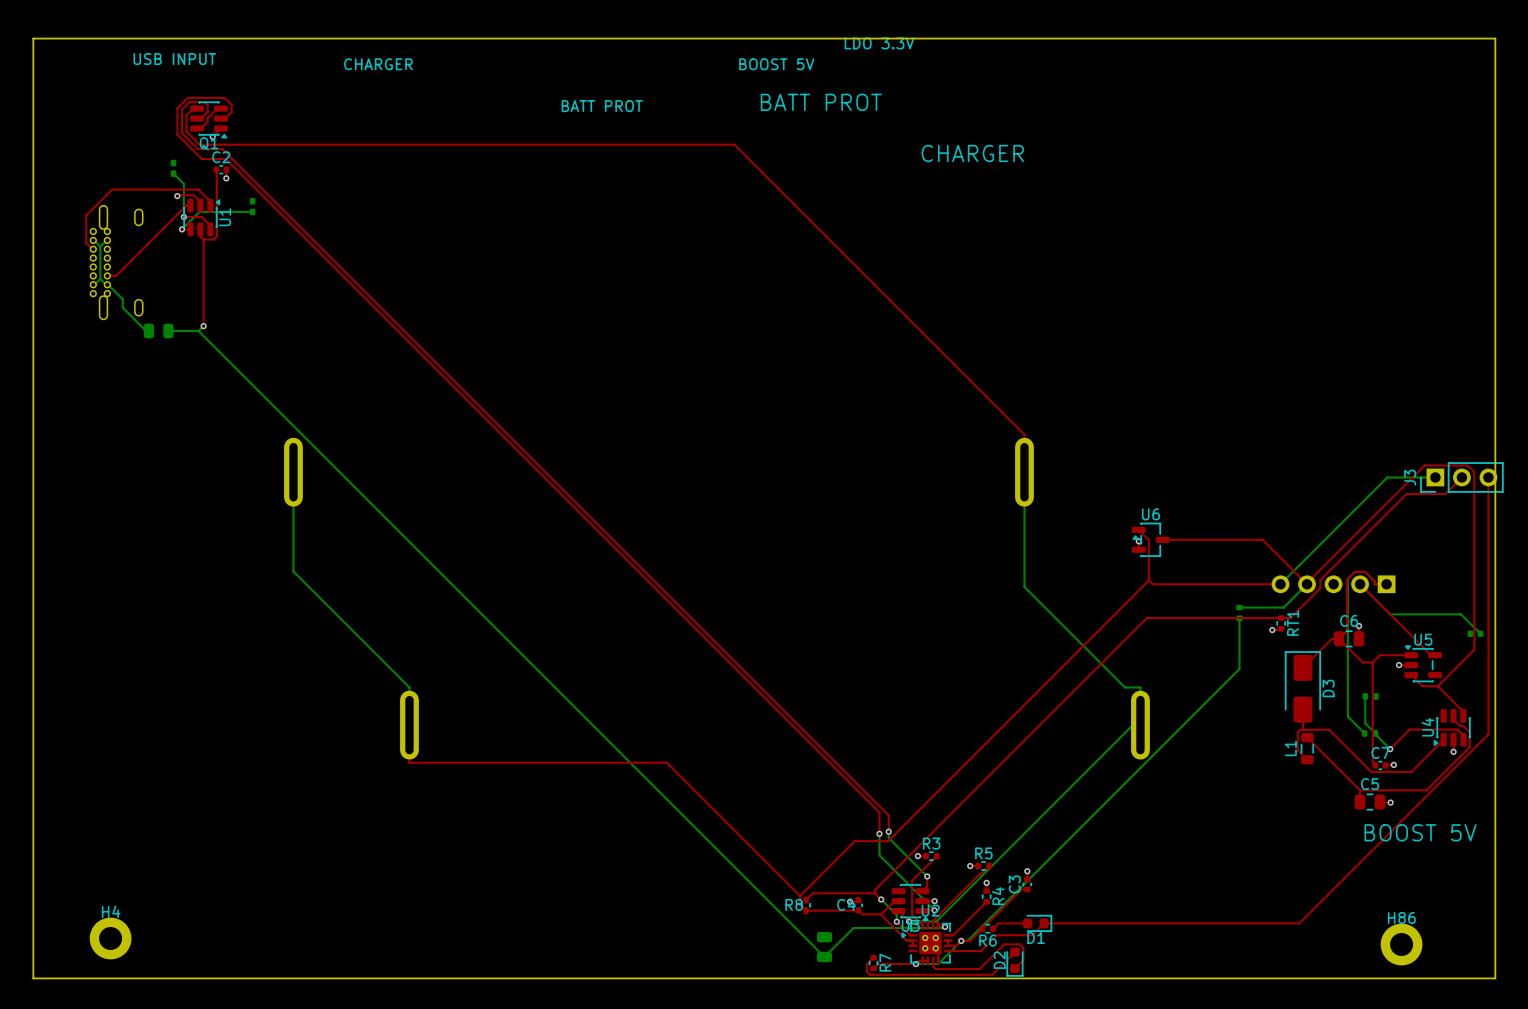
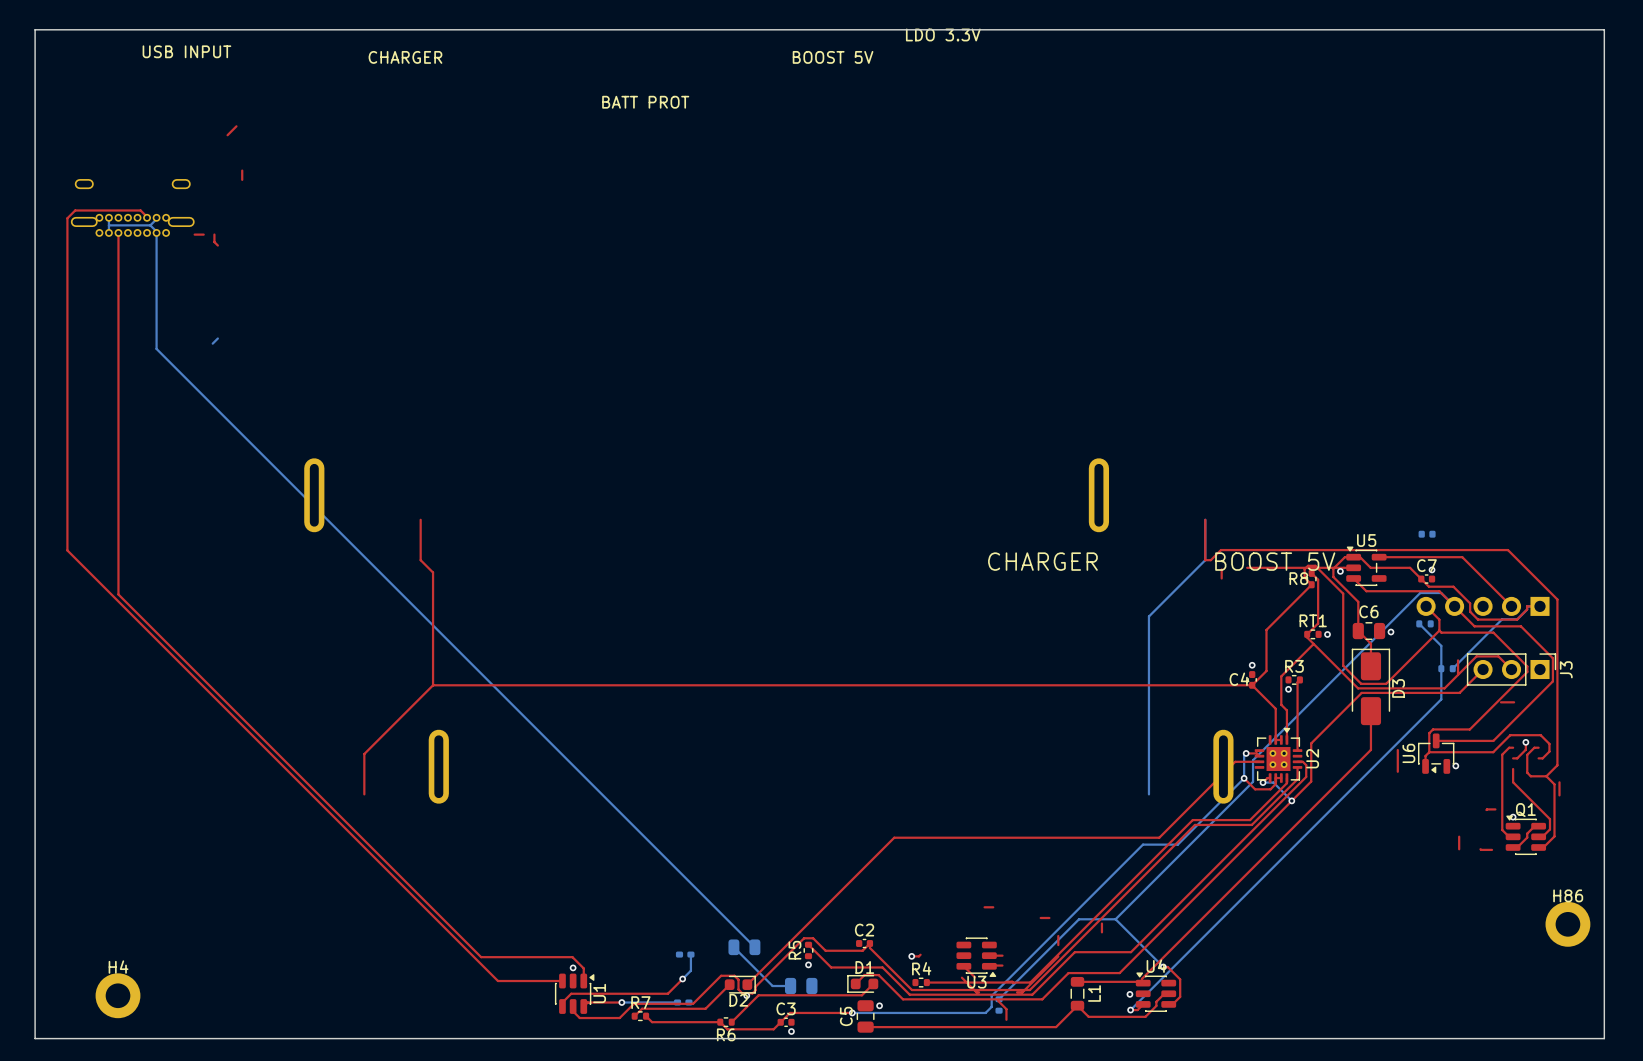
text: BATT PROT (821, 102) -> none
top track: (197, 108) (193, 108) (186, 115) (186, 131) (199, 144) (734, 144) (1024, 434) (1024, 472) -> none
top track: (220, 108) (217, 108) (200, 128) (197, 128) -> none
top track: (197, 118) (201, 118) (207, 111) (207, 105) (204, 102) (189, 102) (182, 109) (182, 133) (198, 149) (222, 149) (888, 815) (888, 831) -> none
top track: (220, 118) (225, 118) (231, 112) (231, 104) (224, 97) (187, 97) (177, 108) (177, 134) (201, 159) (225, 159) (879, 812) (879, 833) -> none
Q1 rotation: 0° (209, 120) -> 180° (1525, 835)
Q1 position: (209, 120) -> (1525, 835)
via: (212, 136) -> none
text: CHARGER (972, 153) -> none
part: (173, 168) -> none
top track: (216, 169) (216, 236) (213, 239) (203, 239) (203, 326) -> none
C2 position: (221, 169) -> (864, 943)
bottom track: (173, 173) (183, 183) (183, 216) -> none
via: (226, 178) -> none
top track: (177, 196) (193, 195) (200, 201) (200, 205) -> none
via: (177, 196) -> none
top track: (190, 205) (186, 205) (116, 275) (107, 275) -> none
top track: (210, 205) (210, 201) (198, 189) (112, 189) (86, 215) (86, 243) (93, 249) -> none
part: (252, 206) -> none
bottom track: (252, 211) (199, 211) (182, 229) -> none
bottom track: none -> (108, 217) (108, 232)
top track: none -> (147, 217) (140, 210) (75, 210) (67, 218) (67, 550) (497, 981) (562, 981)
bottom track: none -> (156, 217) (150, 225)
top track: (183, 216) (201, 216) (210, 225) (210, 229) -> none
via: (183, 216) -> none
U1 position: (201, 217) -> (574, 993)
bottom track: none -> (108, 225) (150, 225)
bottom track: none -> (150, 225) (156, 231) (156, 348) (754, 947)
top track: none -> (118, 232) (118, 594) (481, 957) (572, 957) (583, 968) (583, 981)
via: (182, 229) -> none
bottom track: (93, 240) (100, 246) -> none
bottom track: (107, 240) (100, 246) -> none
bottom track: (100, 246) (100, 278) -> none
part rotation: 0° (116, 262) -> 90° counterclockwise (132, 207)
bottom track: (100, 278) (93, 284) -> none
bottom track: (100, 278) (122, 299) (122, 307) (146, 330) (148, 330) -> none
via: (203, 326) -> none
part: (158, 330) -> none
bottom track: (168, 330) (198, 330) (824, 957) (853, 927) (945, 926) -> none
bottom track: (293, 472) (293, 571) (409, 687) (409, 725) -> none
bottom track: (1024, 472) (1024, 586) (1125, 687) (1140, 687) (1140, 725) -> none
bottom track: (1435, 477) (1387, 477) (1280, 584) -> none
top track: (1461, 477) (1445, 493) (1406, 493) (1320, 580) (1320, 588) (1290, 618) (1147, 618) (875, 890) (875, 893) -> none
J3 rotation: 0° (1461, 477) -> 180° (1511, 669)
J3 position: (1461, 477) -> (1511, 669)
top track: (1488, 477) (1488, 734) (1299, 923) (1044, 923) (1032, 935) (996, 935) (981, 951) (948, 951) -> none
top track: none -> (420, 519) (420, 560) (433, 572) (433, 685)
top track: none -> (1205, 519) (1205, 560) (1210, 560) (1220, 550) (1507, 550) (1557, 599) (1557, 765) (1546, 776)
bottom track: none -> (1205, 519) (1205, 560) (1148, 616) (1148, 794)
top track: (1138, 529) (1148, 539) (1148, 580) -> none
top track: none -> (1379, 557) (1462, 557) (1511, 606)
text: none -> CHARGER (1042, 561)
text: none -> BOOST 5V (1275, 561)
U6 rotation: 0° (1150, 539) -> 90° counterclockwise (1436, 753)
U6 position: (1150, 539) -> (1436, 753)
top track: (1261, 539) (1307, 584) (1424, 465) (1467, 465) (1474, 471) (1474, 649) (1437, 686) -> none
via: (1138, 541) -> none
via: none -> (1432, 569)
via: none -> (1340, 571)
top track: none -> (1311, 573) (1318, 579) (1318, 623) (1307, 634) (1307, 637) (1358, 688) (1444, 688) (1476, 656) (1498, 656) (1511, 669)
top track: none -> (1353, 578) (1366, 591) (1439, 591) (1474, 626) (1520, 626) (1552, 658) (1552, 681) (1493, 740) (1436, 740)
part footprint: [1271, 575, 1396, 594] -> [1416, 620, 1434, 628]
top track: none -> (1426, 606) (1439, 619) (1439, 630)
bottom track: none -> (1454, 606) (1441, 593) (1420, 593) (1253, 760) (1253, 781) (1115, 919)
part: none -> (1483, 606)
top track: none -> (1540, 606) (1527, 606) (1527, 609) (1517, 619) (1477, 619) (1470, 611) (1470, 603) (1453, 586) (1428, 586) (1410, 567) (1370, 567) (1360, 557) (1344, 557) (1333, 568) (1333, 576) (1358, 601) (1358, 631) (1370, 643) (1370, 666)
bottom track: none -> (1540, 606) (1527, 606) (1527, 609) (1517, 619) (1502, 619) (1452, 668)
top track: (1148, 580) (888, 841) (854, 841) (800, 895) -> none
top track: (1148, 580) (1152, 584) (1280, 584) -> none
bottom track: (1307, 584) (1283, 607) (1239, 607) -> none
top track: (1360, 584) (1431, 655) (1435, 655) -> none
bottom track: (1360, 584) (1390, 614) (1460, 614) (1480, 633) -> none
top track: (1386, 584) (1374, 584) (1374, 581) (1365, 571) (1355, 571) (1346, 580) (1346, 631) (1339, 638) -> none
bottom track: (1386, 584) (1374, 584) (1374, 581) (1365, 571) (1354, 571) (1347, 578) (1347, 716) (1364, 733) -> none
bottom track: none -> (1419, 623) (1441, 645) (1441, 699) (1130, 1010)
top track: none -> (1439, 630) (1441, 632) (1493, 632) (1527, 666) (1527, 671) (1469, 729) (1433, 729) (1429, 733) (1429, 752)
top track: none -> (1439, 630) (1386, 683) (1361, 683) (1343, 665) (1343, 593) (1315, 565) (1308, 565) (1304, 569) (1304, 577) (1311, 584) (1266, 629) (1266, 671) (1252, 685)
via: none -> (1390, 632)
via: none -> (1327, 634)
top track: none -> (1313, 643) (1281, 676) (1281, 704) (1286, 710) (1286, 739)
part: (1239, 612) -> none
bottom track: (1239, 618) (1239, 668) (967, 940) (961, 940) (938, 964) (915, 964) -> none
RT1 rotation: 0° (1281, 623) -> 90° clockwise (1312, 634)
RT1 position: (1281, 623) -> (1312, 634)
via: (1359, 626) -> none
via: none -> (1252, 665)
via: (1272, 630) -> none
part: none -> (1447, 668)
part position: (1475, 633) -> (1427, 534)
top track: none -> (1483, 669) (1459, 692) (1361, 692) (1311, 743) (1311, 781) (1119, 973) (1068, 973) (1042, 999) (903, 999) (878, 975) (864, 975) (855, 983)
top track: (1339, 638) (1362, 662) (1372, 662) -> none
top track: (1339, 638) (1331, 638) (1302, 667) -> none
C6 position: (1349, 638) -> (1368, 631)
top track: none -> (1299, 679) (1297, 682) (1297, 750)
top track: none -> (433, 685) (1252, 685)
top track: none -> (433, 685) (364, 754) (364, 794)
top track: none -> (1252, 685) (1275, 708) (1275, 739) (1281, 739)
via: none -> (1288, 689)
top track: (1411, 655) (1380, 655) (1372, 662) -> none
top track: (1372, 662) (1372, 762) (1375, 765) -> none
U5 position: (1423, 663) -> (1366, 566)
via: (1399, 665) -> none
top track: none -> (1370, 711) (1370, 749) (1141, 978) (1141, 981) (1077, 981)
top track: (1411, 675) (1422, 686) (1437, 686) -> none
top track: (1437, 686) (1463, 711) (1463, 715) -> none
D3 position: (1302, 687) -> (1370, 686)
bottom track: (1365, 696) (1365, 723) (1390, 749) -> none
part: (1370, 696) -> none
top track: none -> (1525, 742) (1525, 749) (1517, 758) (1513, 758)
via: none -> (1525, 742)
top track: none -> (1513, 747) (1509, 747) (1502, 754) (1502, 830) (1509, 836) (1513, 836)
top track: none -> (1538, 747) (1534, 747) (1527, 754) (1527, 772) (1530, 776) (1546, 776)
top track: none -> (1429, 752) (1493, 752) (1510, 735) (1540, 735) (1549, 743) (1549, 751) (1542, 758) (1538, 758)
top track: none -> (1429, 752) (1425, 755) (1425, 766)
top track: none -> (1246, 753) (1256, 753) (1259, 756)
bottom track: none -> (1246, 753) (1244, 755) (1244, 778) (1177, 844) (1142, 844) (991, 995) (991, 1006) (985, 1012) (852, 1012)
via: none -> (1246, 753)
top track: (1453, 715) (1453, 719) (1469, 732) (1469, 746) (1426, 790) (1360, 790) (1307, 737) -> none
bottom track: (1140, 717) (936, 921) (909, 921) -> none
top track: none -> (1259, 761) (1235, 761) (1159, 837) (894, 837) (747, 984)
top track: none -> (1297, 761) (1302, 761) (1306, 765) (1306, 776) (1130, 952) (1074, 952) (1032, 994) (909, 994) (882, 967) (831, 967) (808, 944)
via: none -> (1455, 765)
top track: (409, 725) (409, 762) (666, 762) (800, 895) -> none
top track: none -> (1297, 767) (1297, 779) (1251, 824) (1194, 824) (1029, 990) (911, 990) (869, 947) (869, 943) (862, 950) (825, 950) (813, 938) (804, 938) (755, 986) (752, 993) (742, 993) (738, 989) (738, 979) (734, 975) (721, 975) (693, 1003) (633, 1003) (619, 1018) (579, 1018) (573, 1011) (573, 1006)
top track: none -> (1513, 769) (1513, 782) (1549, 819) (1549, 829) (1542, 836) (1538, 836)
U4 rotation: 0° (1452, 727) -> 90° clockwise (1155, 992)
U4 position: (1452, 727) -> (1155, 992)
part: (1370, 733) -> none
top track: none -> (1546, 776) (1554, 784) (1554, 836) (1543, 847) (1538, 847)
via: none -> (1244, 778)
top track: none -> (1270, 778) (1263, 782)
top track: none -> (1281, 778) (1275, 778) (1275, 784) (1270, 789) (1255, 789) (1244, 778)
top track: none -> (1286, 778) (1286, 783) (1250, 820) (1192, 820) (1030, 982) (926, 982)
bottom track: none -> (1263, 782) (1273, 782) (1291, 800)
via: none -> (1263, 782)
top track: (1443, 739) (1411, 771) (1371, 771) (1329, 729) (1300, 729) (1297, 732) (1297, 750) (1307, 759) -> none
top track: (1463, 739) (1463, 735) (1457, 729) (1409, 729) (1390, 749) -> none
L1 name position: L1 (1290, 748) -> L1 (1094, 993)
L1 position: (1307, 748) -> (1077, 993)
via: (1390, 749) -> none
via: (1453, 751) -> none
via: none -> (1291, 800)
via: (1393, 764) -> none
C7 position: (1380, 765) -> (1426, 579)
via: none -> (1513, 817)
top track: none -> (1538, 826) (1534, 826) (1517, 847) (1513, 847)
C5 name position: C5 (1370, 784) -> C5 (846, 1016)
C5 rotation: 0° (1370, 802) -> 90° clockwise (865, 1016)
C5 position: (1370, 802) -> (865, 1016)
via: (1390, 802) -> none
bottom track: (888, 831) (888, 837) (927, 876) -> none
via: (888, 831) -> none
text: BOOST 5V (1420, 832) -> none
bottom track: (879, 833) (879, 855) (934, 910) -> none
via: (879, 833) -> none
via: (917, 856) -> none
R3 position: (931, 856) -> (1294, 679)
top track: (936, 856) (912, 880) (912, 914) (922, 925) -> none
via: (970, 866) -> none
R5 rotation: 0° (983, 866) -> 90° clockwise (808, 950)
R5 position: (983, 866) -> (808, 950)
top track: (988, 866) (933, 920) (933, 925) -> none
bottom track: none -> (1115, 919) (1163, 967)
bottom track: none -> (1115, 919) (1079, 919) (999, 999)
via: (1027, 871) -> none
top track: (927, 876) (927, 886) (922, 891) -> none
via: (927, 876) -> none
via: (986, 882) -> none
C3 rotation: 0° (1027, 884) -> 90° clockwise (786, 1022)
C3 position: (1027, 884) -> (786, 1022)
top track: (1027, 889) (1021, 889) (970, 940) (961, 940) (956, 945) (948, 945) (948, 940) -> none
bottom track: none -> (733, 947) (772, 986) (790, 986)
part: none -> (744, 947)
top track: (875, 893) (881, 899) -> none
top track: (875, 893) (812, 893) (806, 899) -> none
top track: (800, 895) (800, 904) (806, 910) (858, 910) (862, 914) (881, 914) -> none
R4 rotation: 0° (986, 896) -> 90° clockwise (921, 982)
R4 position: (986, 896) -> (921, 982)
bottom track: (881, 899) (896, 915) (896, 921) -> none
via: (881, 899) -> none
part: none -> (685, 954)
bottom track: none -> (690, 954) (690, 970) (682, 978)
top track: (898, 901) (894, 901) (881, 914) -> none
via: (934, 901) -> none
R8 position: (806, 905) -> (1311, 579)
C4 position: (858, 905) -> (1252, 679)
via: none -> (808, 964)
via: (934, 910) -> none
top track: none -> (1163, 967) (1167, 967) (1180, 979) (1180, 996) (1172, 1004) (1168, 1004)
via: none -> (1163, 967)
via: none -> (573, 967)
top track: (881, 914) (906, 940) (912, 940) (912, 945) -> none
via: (896, 921) -> none
via: (909, 921) -> none
top track: none -> (682, 978) (667, 993) (571, 993) (562, 1002) (562, 1006)
via: none -> (682, 978)
top track: (1027, 923) (998, 923) (993, 928) -> none
D1 rotation: 0° (1037, 923) -> 180° (862, 983)
D1 position: (1037, 923) -> (862, 983)
via: (945, 926) -> none
top track: none -> (873, 983) (862, 995) (758, 995) (731, 1022)
top track: none -> (729, 984) (705, 1008) (642, 1008) (634, 1016)
R6 position: (987, 928) -> (726, 1022)
top track: none -> (1168, 993) (1164, 993) (1156, 1001) (1156, 1005) (1145, 1016) (1088, 1016) (1077, 1005) (1056, 1027) (865, 1027)
via: none -> (1129, 994)
via: none -> (746, 995)
via: (961, 940) -> none
U2 rotation: 0° (927, 943) -> 90° clockwise (1278, 755)
U2 position: (927, 943) -> (1278, 755)
top track: none -> (621, 1002) (587, 1002) (583, 1006)
bottom track: none -> (621, 1002) (677, 1002)
via: none -> (621, 1002)
part: none -> (683, 1002)
H86 position: (1401, 944) -> (1567, 924)
top track: none -> (1143, 1004) (1137, 1010) (1130, 1010)
via: none -> (879, 1005)
part rotation: 0° (824, 947) -> 90° clockwise (801, 986)
part position: (824, 947) -> (801, 986)
part: none -> (999, 1004)
via: none -> (1130, 1010)
top track: (1014, 952) (992, 974) (869, 974) (866, 971) (866, 964) (873, 957) -> none
top track: none -> (852, 1012) (790, 1012) (773, 1029) (727, 1029) (720, 1022) (652, 1022) (646, 1016)
via: none -> (852, 1012)
top track: (927, 960) (919, 960) (915, 964) (878, 964) (873, 968) -> none
top track: (933, 960) (933, 966) (935, 969) (979, 969) (1004, 944) (1019, 944) (1023, 947) (1023, 960) (1014, 968) -> none
D2 rotation: 0° (1014, 962) -> 90° counterclockwise (740, 984)
D2 position: (1014, 962) -> (740, 984)
R7 rotation: 0° (873, 963) -> 90° clockwise (640, 1016)
R7 position: (873, 963) -> (640, 1016)
via: (915, 964) -> none
via: none -> (791, 1031)

